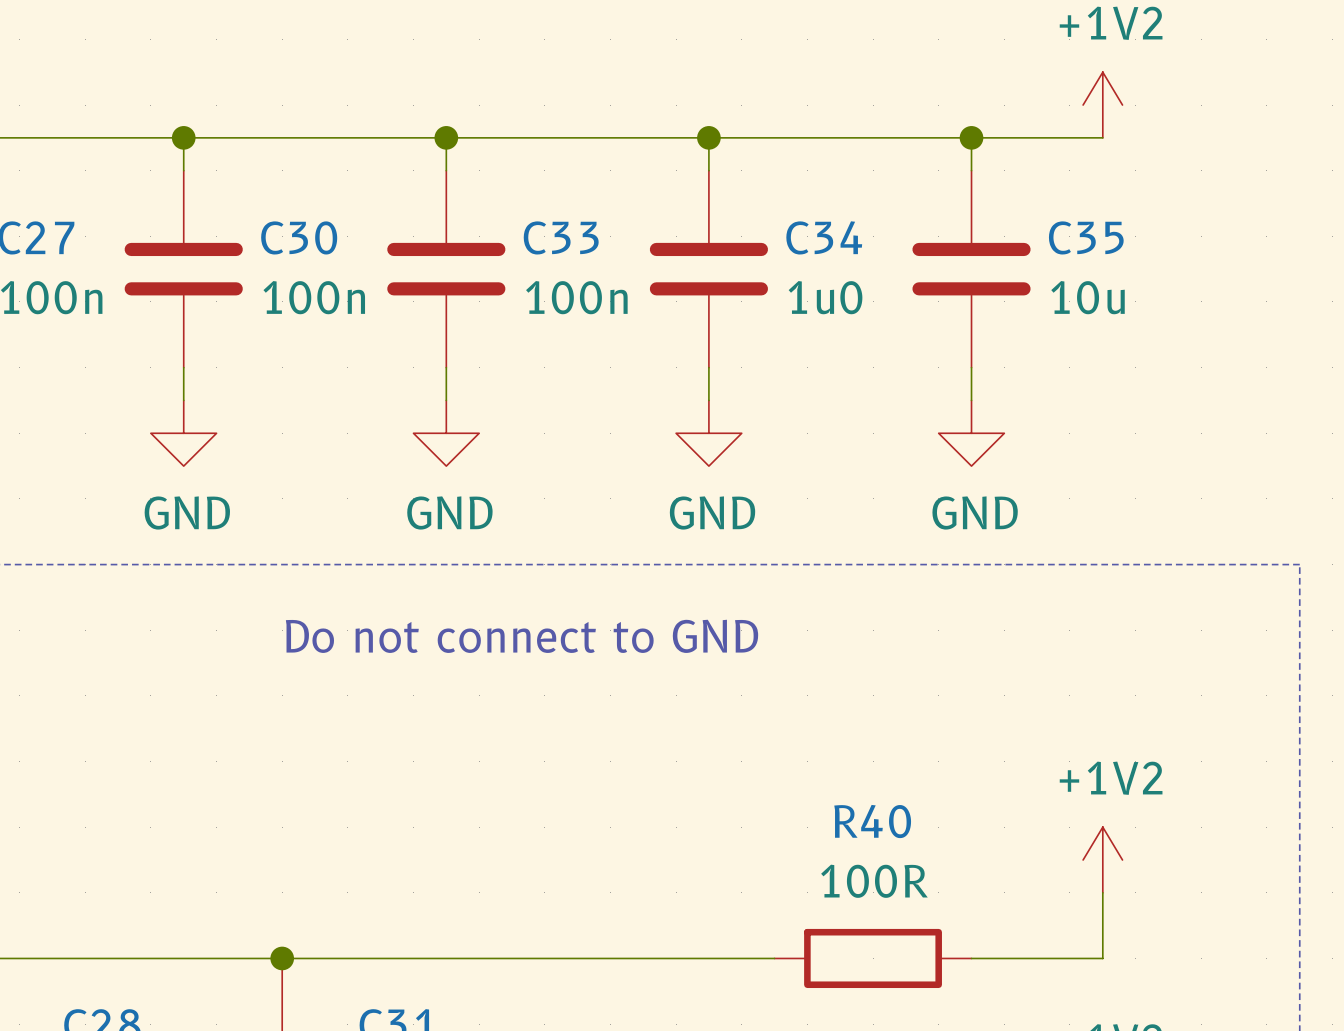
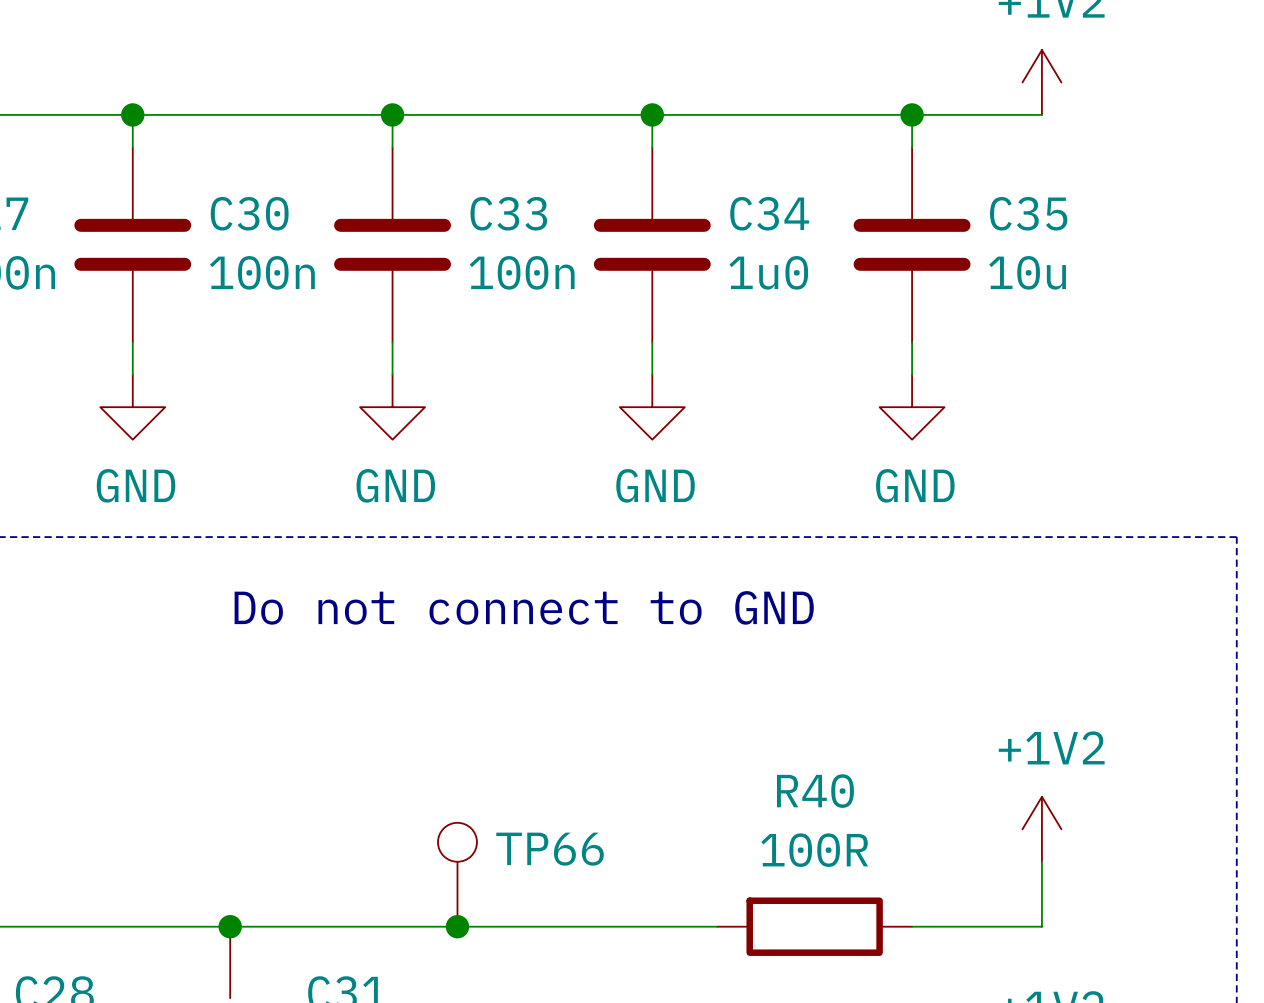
TP66: none -> (457, 874)
junction: none -> (457, 926)

